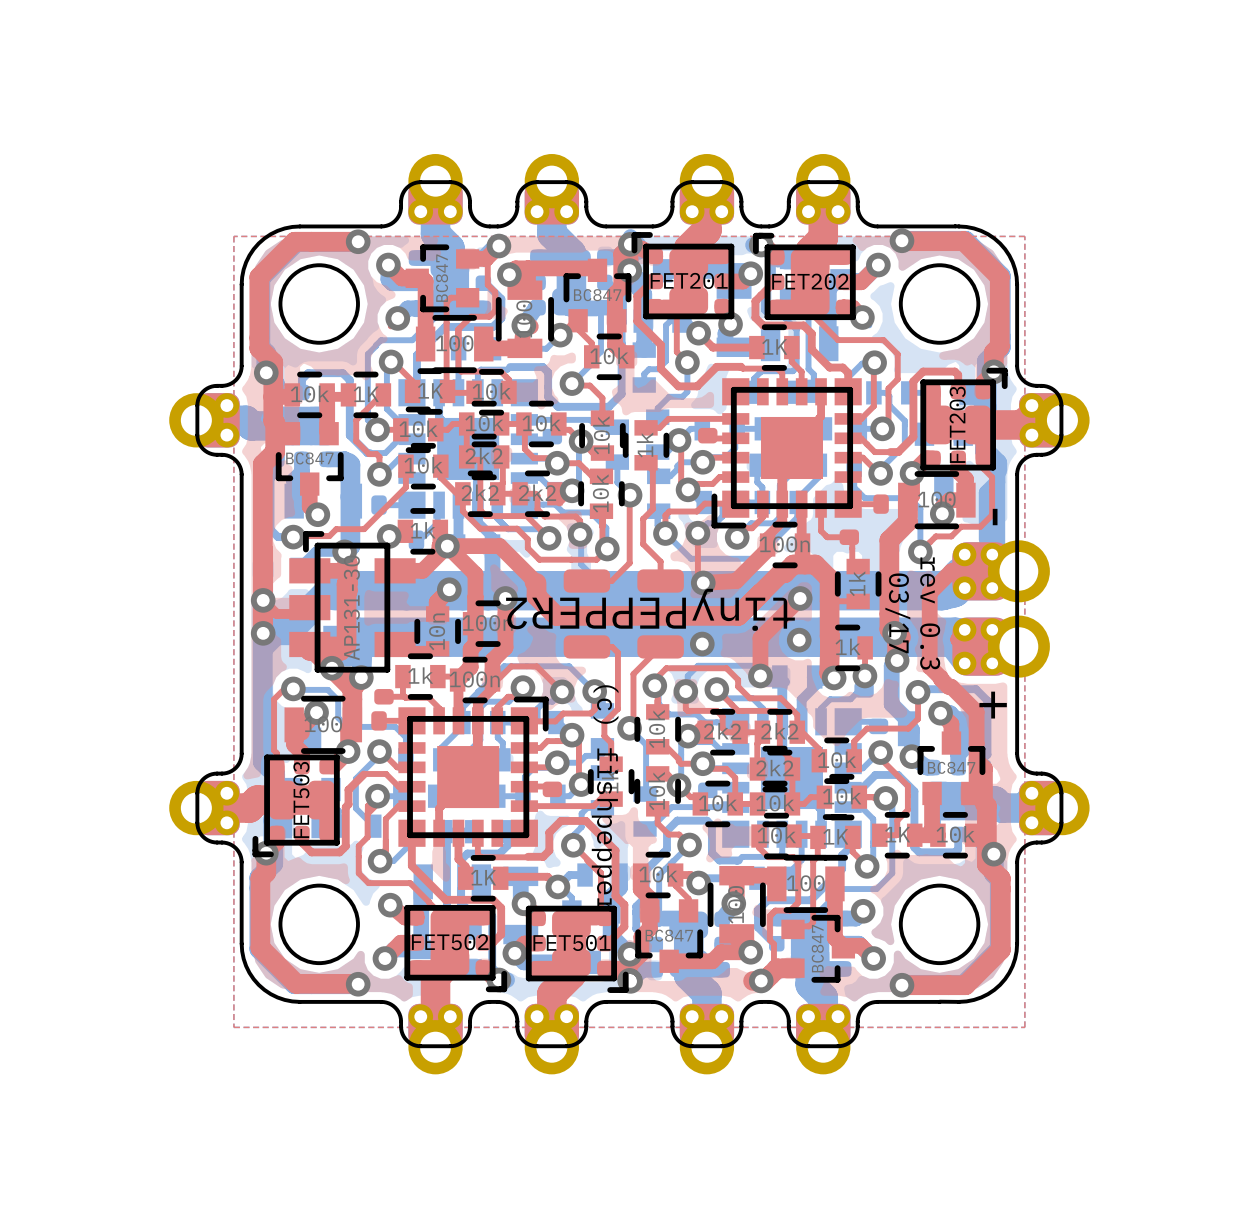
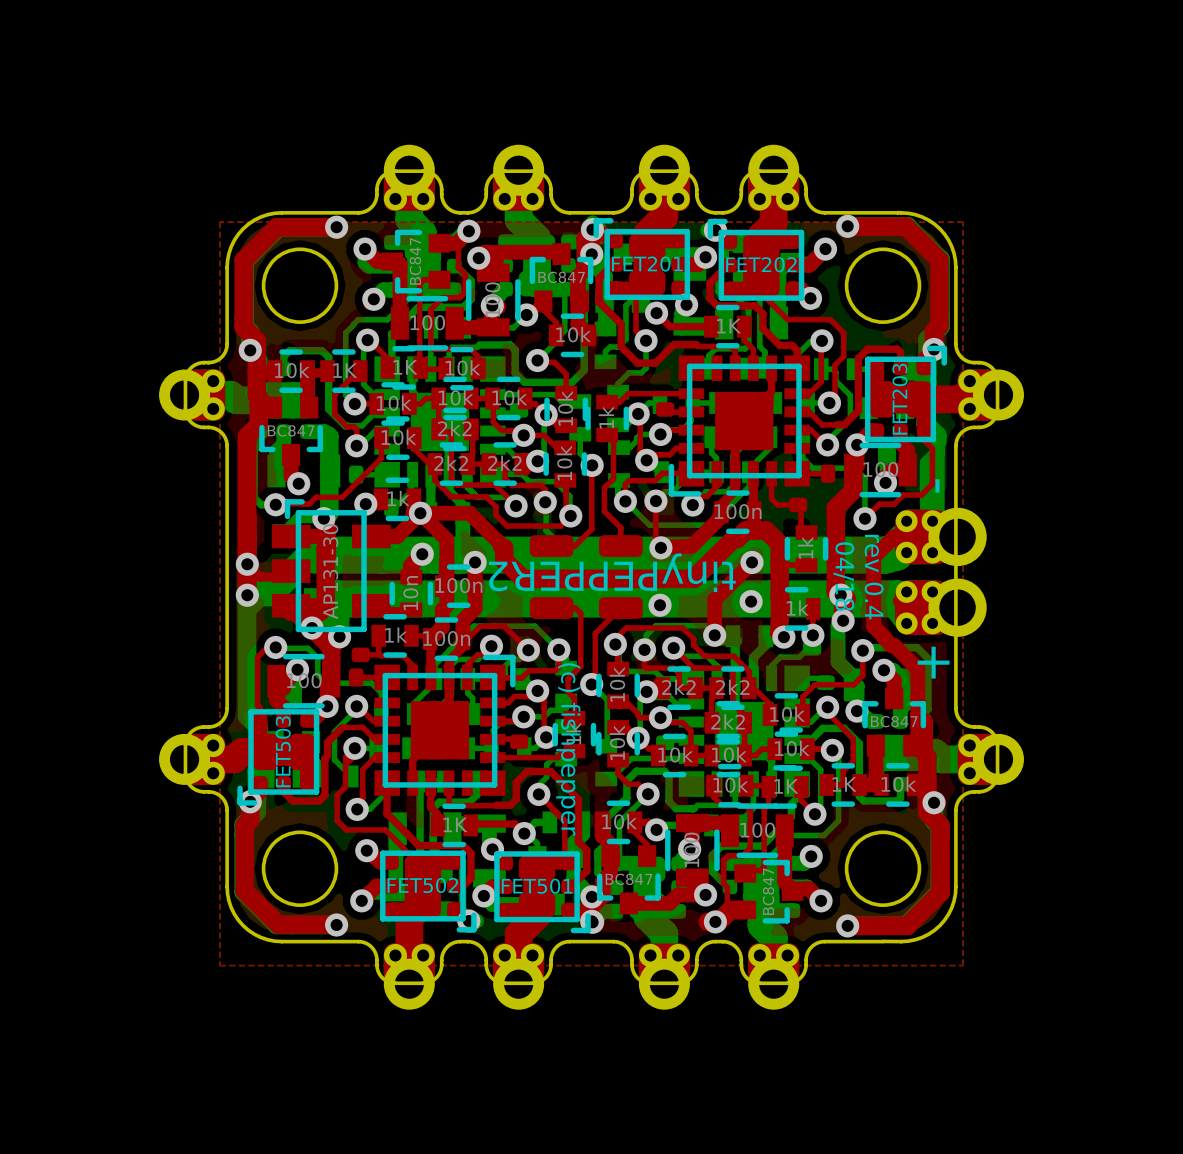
text: 03/17 (897, 613) -> 04/18 (843, 576)
text: rev 0.3 (930, 613) -> rev 0.4 (874, 577)

